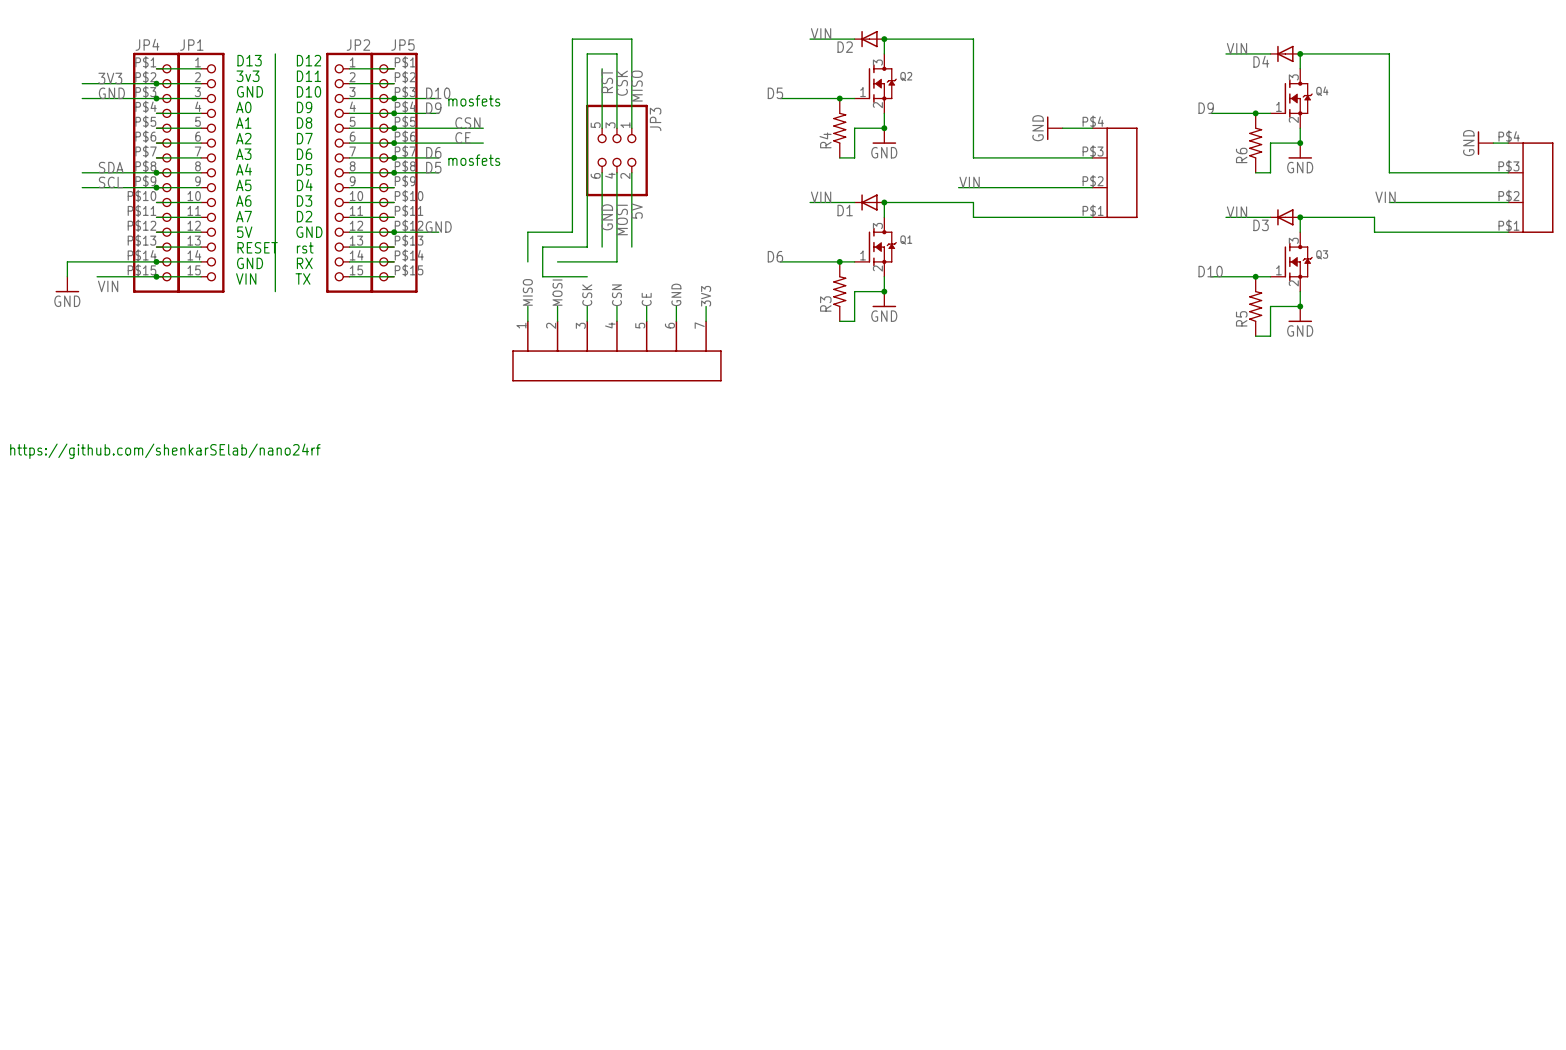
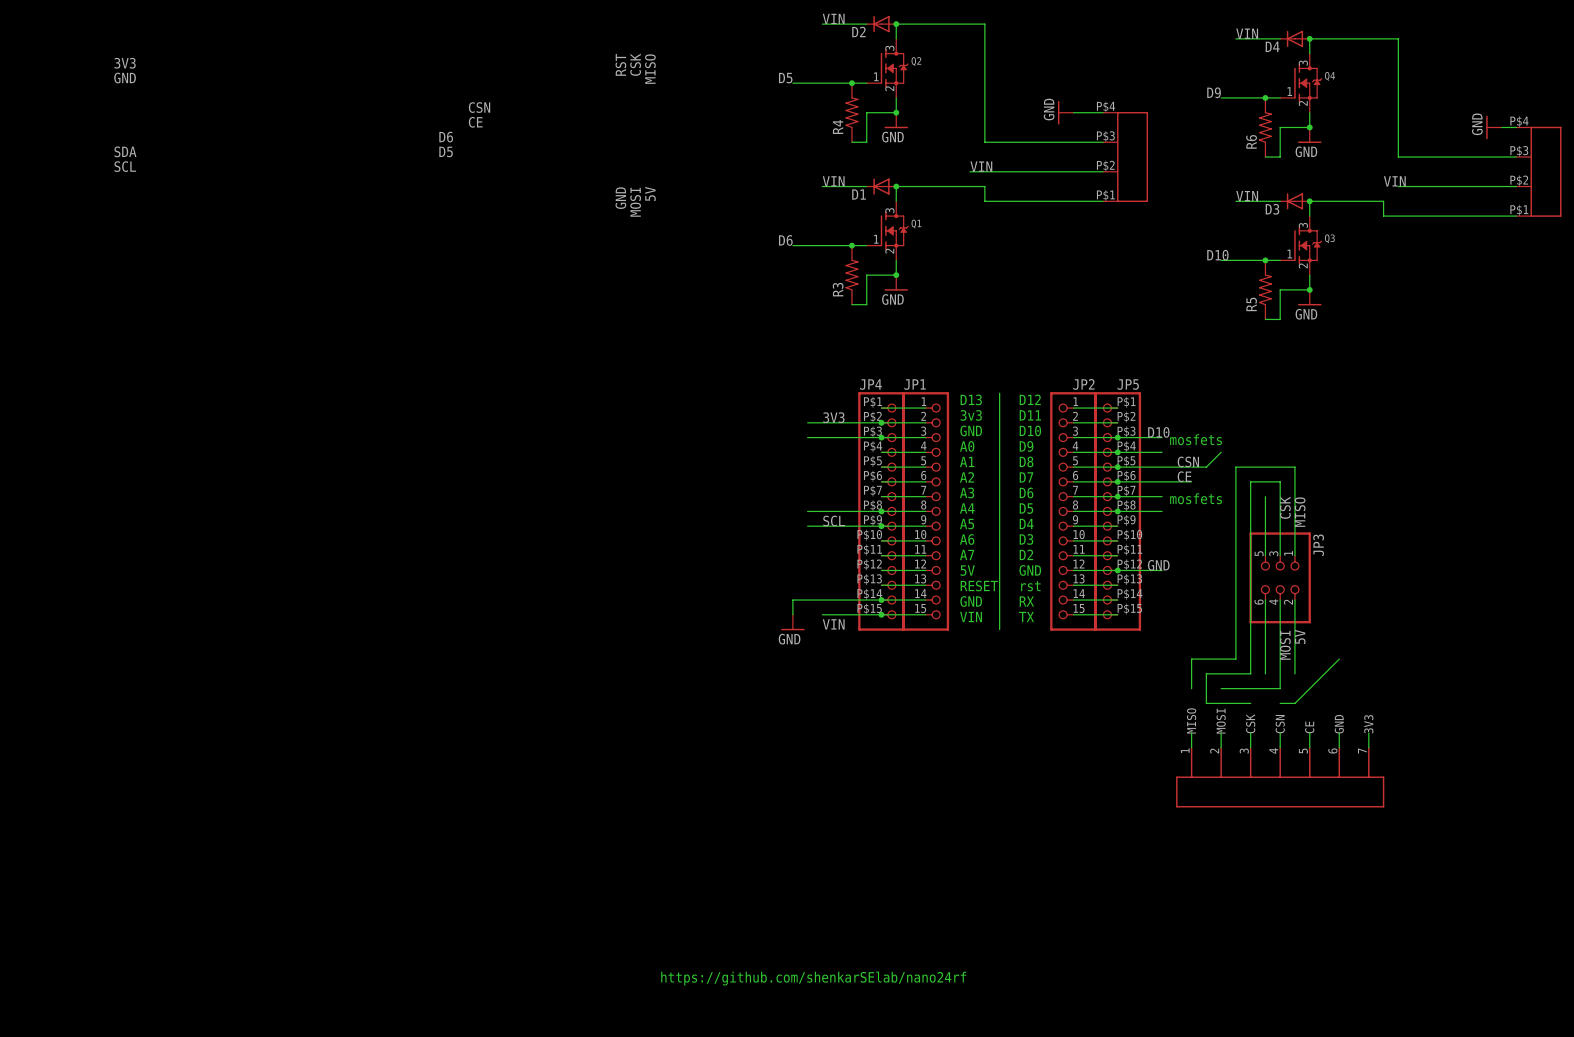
wire: (275, 53) (275, 291) -> none
text: D13 (249, 60) -> none
text: D12 (309, 60) -> none
wire: (156, 68) (201, 68) -> none
wire: (349, 68) (394, 68) -> none
wire: (602, 68) (602, 128) -> none
text: 3v3 (248, 76) -> none
text: D11 (309, 76) -> none
wire: (82, 83) (201, 83) -> none
junction: (156, 83) -> none
wire: (349, 83) (394, 83) -> none
text: GND (250, 91) -> none
text: D10 (309, 91) -> none
label: D10 (438, 93) -> none
wire: (82, 98) (201, 98) -> none
junction: (156, 98) -> none
wire: (349, 98) (438, 98) -> none
junction: (394, 98) -> none
text: mosfets (474, 100) -> none
text: A0 (243, 107) -> none
text: D9 (304, 107) -> none
label: D9 (433, 108) -> none
wire: (156, 113) (201, 113) -> none
wire: (349, 113) (438, 113) -> none
junction: (394, 113) -> none
text: A1 (243, 123) -> none
text: D8 (304, 123) -> none
wire: (156, 128) (201, 128) -> none
wire: (349, 128) (466, 128) -> none
junction: (394, 128) -> none
wire: (468, 128) (483, 128) -> none
wire: (616, 128) (616, 53) (587, 53) (587, 247) (542, 247) (542, 276) (587, 276) -> none
wire: (631, 128) (631, 39) (572, 39) (572, 232) (527, 232) (527, 261) -> none
text: A2 (243, 138) -> none
text: D7 (304, 138) -> none
wire: (156, 143) (201, 143) -> none
wire: (349, 143) (483, 143) -> none
junction: (394, 143) -> none
JP3 position: (616, 150) -> (1280, 577)
text: A3 (243, 154) -> none
text: D6 (304, 154) -> none
wire: (156, 157) (201, 157) -> none
wire: (349, 157) (438, 157) -> none
junction: (394, 157) -> none
text: mosfets (474, 160) -> none
text: A4 (244, 169) -> none
text: D5 (304, 169) -> none
wire: (82, 172) (201, 172) -> none
JP4 position: (156, 172) -> (881, 511)
junction: (156, 172) -> none
JP1 position: (201, 172) -> (925, 511)
wire: (349, 172) (438, 172) -> none
JP2 position: (349, 172) -> (1073, 511)
JP5 position: (394, 172) -> (1117, 511)
junction: (394, 172) -> none
wire: (602, 172) (602, 247) -> none
wire: (616, 172) (616, 261) (557, 261) -> none
wire: (631, 172) (631, 247) -> none
text: A5 (243, 185) -> none
text: D4 (304, 185) -> none
wire: (82, 187) (201, 187) -> none
junction: (156, 187) -> none
wire: (349, 187) (394, 187) -> none
text: A6 (243, 201) -> none
text: D3 (304, 201) -> none
wire: (156, 202) (201, 202) -> none
wire: (349, 202) (394, 202) -> none
text: A7 (244, 216) -> none
text: D2 (304, 216) -> none
wire: (156, 217) (201, 217) -> none
wire: (349, 217) (394, 217) -> none
label: GND (438, 227) -> none
wire: (156, 232) (201, 232) -> none
text: 5V (244, 232) -> none
text: GND (309, 232) -> none
wire: (349, 232) (438, 232) -> none
junction: (394, 232) -> none
wire: (156, 247) (201, 247) -> none
text: RESET (257, 247) -> none
text: rst (305, 247) -> none
wire: (349, 247) (394, 247) -> none
junction: (156, 261) -> none
wire: (201, 261) (67, 261) (67, 276) -> none
wire: (349, 261) (394, 261) -> none
text: GND (250, 263) -> none
text: RX (304, 263) -> none
wire: (97, 276) (201, 276) -> none
junction: (156, 276) -> none
wire: (349, 276) (394, 276) -> none
text: VIN (246, 278) -> none
text: TX (302, 278) -> none
power symbol: GND (67, 284) -> none
label: VIN (108, 286) -> none
wire: (527, 306) (527, 321) -> none
wire: (557, 306) (557, 321) -> none
wire: (587, 306) (587, 321) -> none
wire: (616, 306) (616, 321) -> none
wire: (646, 306) (646, 321) -> none
wire: (676, 306) (676, 321) -> none
wire: (706, 306) (706, 321) -> none
part: (616, 351) -> none
wire: none -> (999, 393) (999, 629)
text: none -> D13 (971, 399)
text: none -> D12 (1030, 399)
wire: none -> (881, 408) (925, 408)
wire: none -> (1073, 408) (1117, 408)
text: none -> 3v3 (971, 415)
text: none -> D11 (1030, 415)
label: none -> 3V3 (833, 417)
wire: none -> (807, 422) (925, 422)
junction: none -> (881, 422)
wire: none -> (1073, 422) (1117, 422)
text: none -> GND (971, 430)
text: none -> D10 (1030, 430)
label: none -> D10 (1158, 432)
text: https://github.com/shenkarSElab/nano24rf (165, 451) -> none
wire: none -> (807, 437) (925, 437)
junction: none -> (881, 437)
wire: none -> (1073, 437) (1162, 437)
junction: none -> (1117, 437)
text: none -> mosfets (1196, 439)
text: none -> A0 (967, 446)
text: none -> D9 (1026, 446)
wire: none -> (881, 452) (925, 452)
wire: none -> (1073, 452) (1162, 452)
junction: none -> (1117, 452)
wire: none -> (1221, 452) (1206, 467) (1191, 467)
text: none -> A1 (967, 461)
text: none -> D8 (1026, 461)
label: none -> CSN (1188, 461)
wire: none -> (881, 467) (925, 467)
wire: none -> (1073, 467) (1190, 467)
junction: none -> (1117, 467)
label: none -> CE (1184, 476)
text: none -> A2 (967, 477)
text: none -> D7 (1026, 477)
wire: none -> (881, 481) (925, 481)
wire: none -> (1073, 481) (1191, 481)
junction: none -> (1117, 481)
text: none -> A3 (967, 492)
text: none -> D6 (1026, 492)
wire: none -> (881, 496) (925, 496)
wire: none -> (1073, 496) (1162, 496)
junction: none -> (1117, 496)
wire: none -> (1265, 496) (1265, 555)
text: none -> mosfets (1196, 498)
text: none -> A4 (967, 508)
text: none -> D5 (1026, 508)
label: none -> CSK (1285, 507)
wire: none -> (807, 511) (925, 511)
junction: none -> (881, 511)
wire: none -> (1073, 511) (1162, 511)
junction: none -> (1117, 511)
label: none -> MISO (1300, 512)
label: none -> SCL (834, 521)
text: none -> A5 (967, 524)
text: none -> D4 (1026, 523)
wire: none -> (807, 526) (925, 526)
junction: none -> (881, 526)
wire: none -> (1073, 526) (1117, 526)
text: none -> A6 (967, 539)
text: none -> D3 (1026, 539)
wire: none -> (881, 540) (925, 540)
wire: none -> (1073, 540) (1117, 540)
wire: none -> (881, 555) (925, 555)
text: none -> A7 (967, 554)
text: none -> D2 (1026, 554)
wire: none -> (1073, 555) (1117, 555)
wire: none -> (1280, 555) (1280, 481) (1250, 481) (1250, 673) (1206, 673) (1206, 703) (1250, 703)
wire: none -> (1294, 555) (1294, 467) (1235, 467) (1235, 659) (1191, 659) (1191, 688)
label: none -> GND (1158, 565)
wire: none -> (881, 570) (925, 570)
text: none -> 5V (967, 570)
text: none -> GND (1030, 570)
wire: none -> (1073, 570) (1162, 570)
junction: none -> (1117, 570)
wire: none -> (881, 585) (925, 585)
wire: none -> (1073, 585) (1117, 585)
text: none -> RESET (979, 586)
text: none -> rst (1030, 586)
junction: none -> (881, 600)
wire: none -> (925, 600) (792, 600) (792, 614)
wire: none -> (1073, 600) (1117, 600)
wire: none -> (1265, 600) (1265, 673)
wire: none -> (1280, 600) (1280, 688) (1221, 688)
wire: none -> (1294, 600) (1294, 673)
text: none -> GND (971, 601)
text: none -> RX (1026, 601)
wire: none -> (822, 614) (925, 614)
junction: none -> (881, 614)
wire: none -> (1073, 614) (1117, 614)
text: none -> VIN (971, 617)
text: none -> TX (1026, 617)
power symbol: none -> GND (792, 622)
label: none -> VIN (833, 624)
label: none -> 5V (1300, 636)
label: none -> MOSI (1285, 645)
wire: none -> (1339, 659) (1294, 703) (1280, 703)
wire: none -> (1191, 732) (1191, 747)
wire: none -> (1221, 732) (1221, 747)
wire: none -> (1250, 732) (1250, 747)
wire: none -> (1280, 732) (1280, 747)
wire: none -> (1309, 732) (1309, 747)
wire: none -> (1339, 732) (1339, 747)
wire: none -> (1368, 732) (1368, 747)
part: none -> (1280, 777)
text: none -> https://github.com/shenkarSElab/nano24rf (813, 978)

